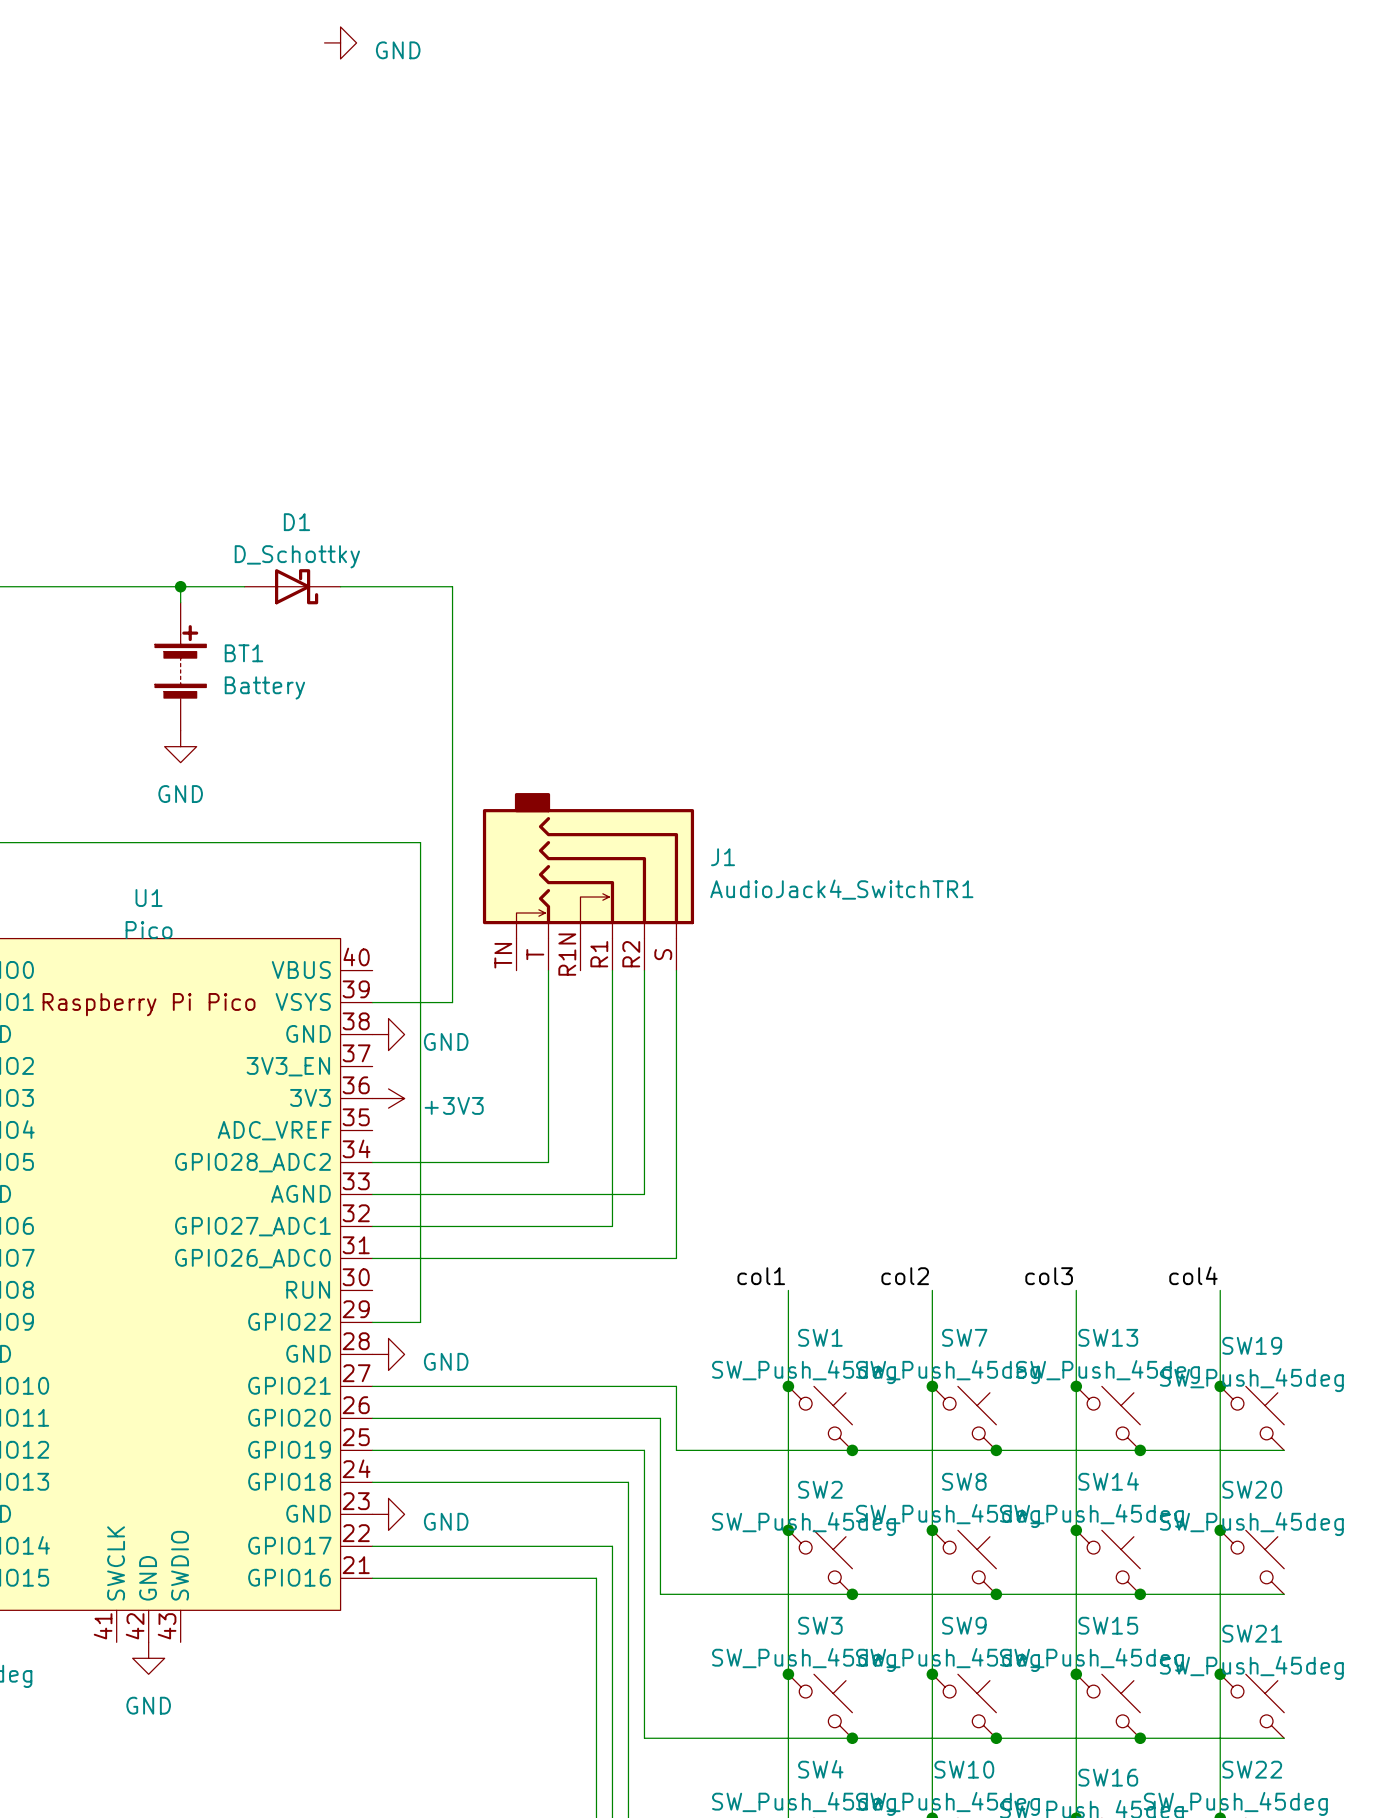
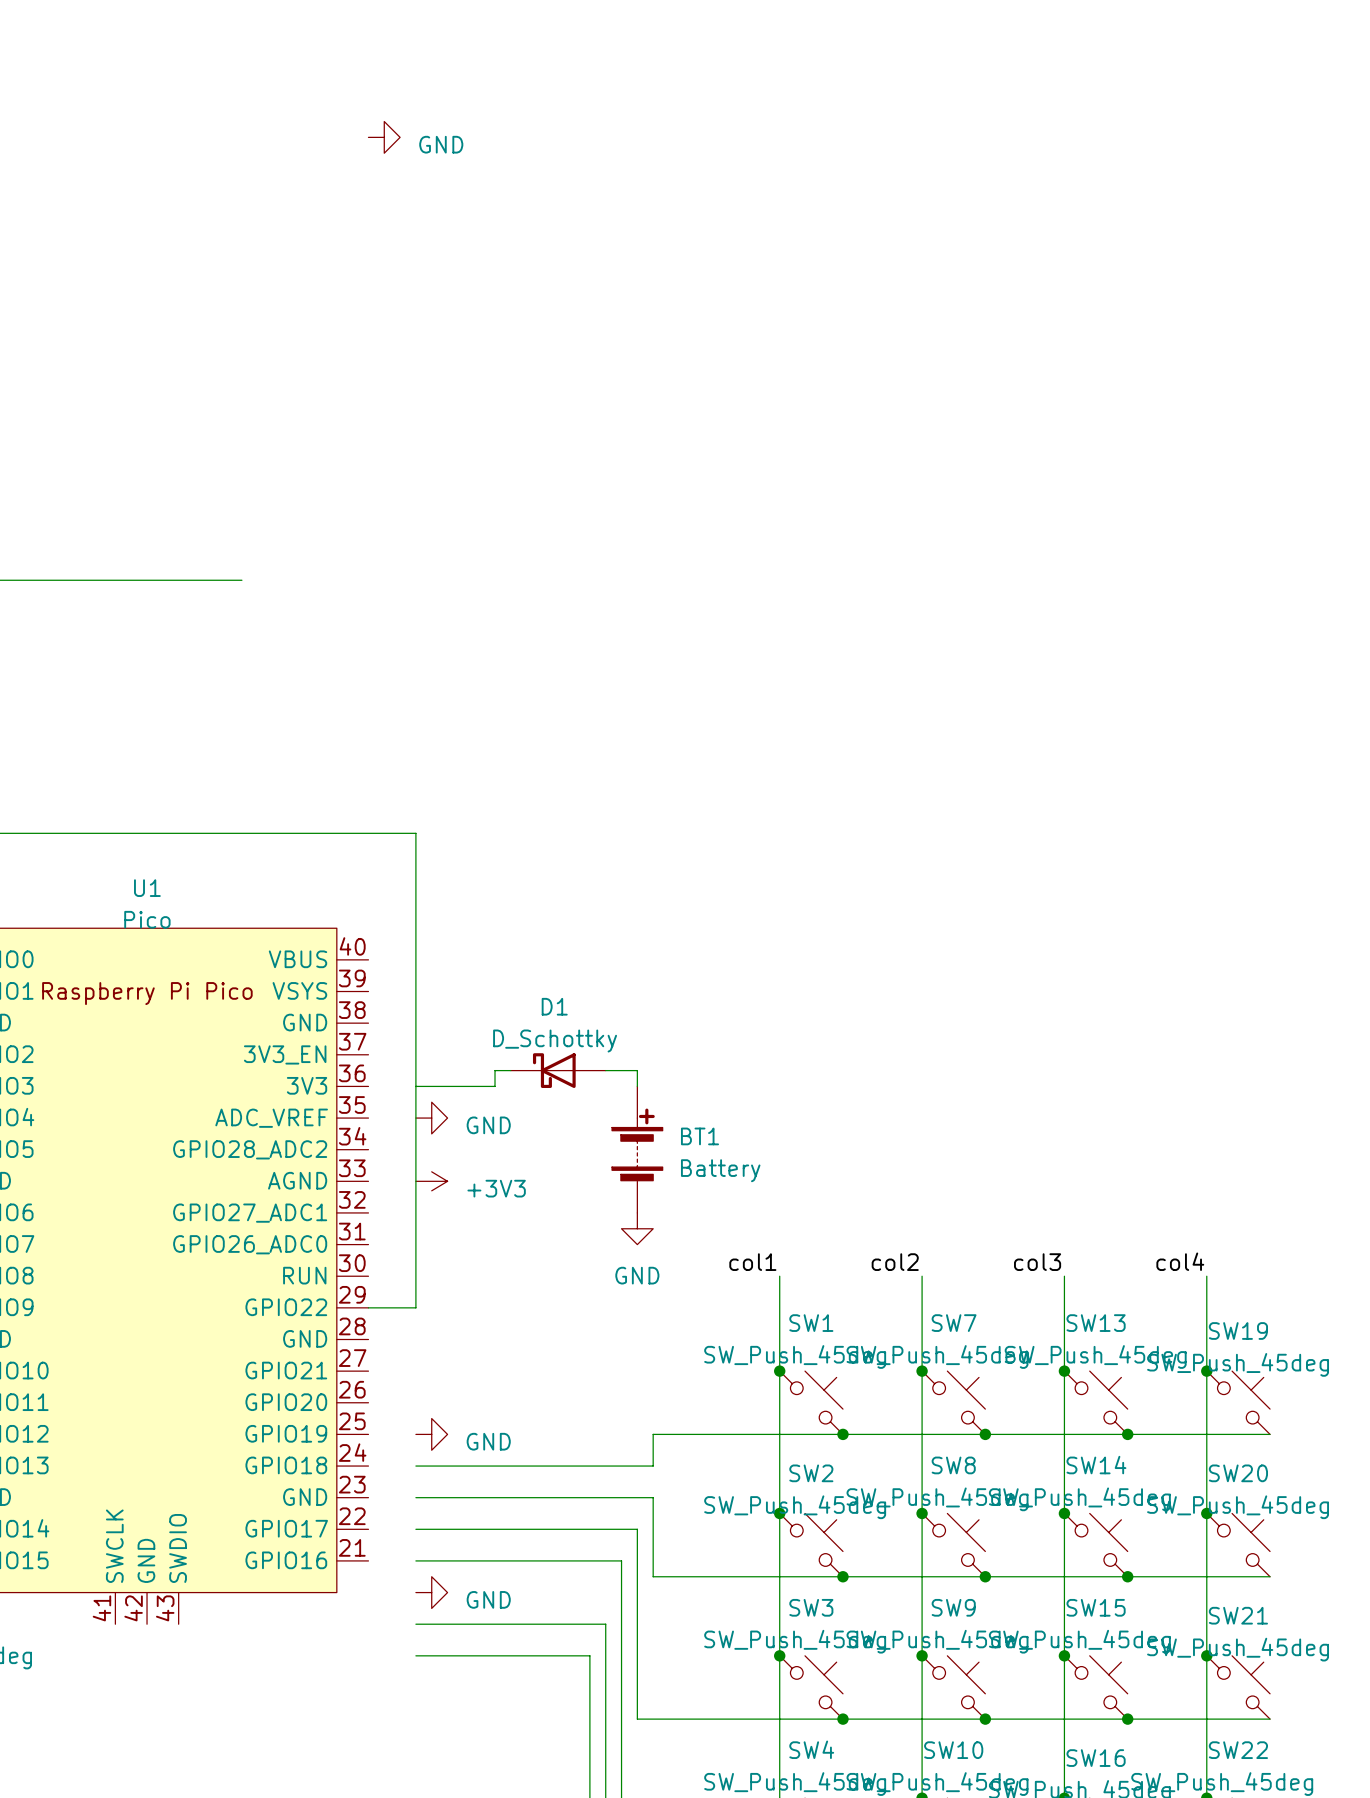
power symbol position: GND (340, 42) -> GND (384, 137)
wire: (180, 586) (180, 602) -> none
junction: (180, 586) -> none
D1 position: (292, 586) -> (558, 1070)
D1 rotation: 0° (296, 586) -> 180° (554, 1070)
wire: (340, 586) (452, 586) (452, 1002) (372, 1002) -> none
BT1 position: (180, 666) -> (637, 1149)
power symbol: GND (180, 746) -> none
J1: AudioJack4_SwitchTR1 (588, 881) -> none
wire: (548, 970) (548, 1162) (372, 1162) -> none
wire: (612, 970) (612, 1226) (372, 1226) -> none
wire: (644, 970) (644, 1082) -> (605, 1070) (637, 1070)
wire: (676, 970) (676, 1258) (372, 1258) -> none
power symbol position: GND (388, 1034) -> GND (431, 1118)
wire: none -> (510, 1070) (495, 1070) (495, 1086) (415, 1086)
power symbol position: +3V3 (388, 1098) -> +3V3 (431, 1181)
wire: (644, 1098) (644, 1194) (372, 1194) -> none
power symbol: none -> GND (637, 1228)
power symbol: GND (388, 1354) -> none
wire: (372, 1386) (676, 1386) (676, 1450) -> (653, 1434) (668, 1434)
wire: (372, 1418) (660, 1418) (660, 1450) -> none
wire: (372, 1450) (644, 1450) (644, 1546) -> none
power symbol: none -> GND (431, 1434)
wire: (372, 1482) (420, 1482) -> none
wire: (628, 1482) (628, 1578) -> none
wire: (660, 1482) (660, 1514) -> (653, 1466) (621, 1466)
power symbol: GND (388, 1514) -> none
wire: none -> (415, 1497) (653, 1497)
wire: (372, 1546) (420, 1546) -> none
wire: (612, 1546) (612, 1642) -> (605, 1529) (637, 1529)
wire: (372, 1578) (420, 1578) -> none
wire: (596, 1578) (596, 1674) -> (589, 1560) (621, 1560)
power symbol: none -> GND (431, 1592)
wire: none -> (415, 1624) (605, 1624)
power symbol: GND (148, 1658) -> none
wire: none -> (415, 1655) (589, 1655)

